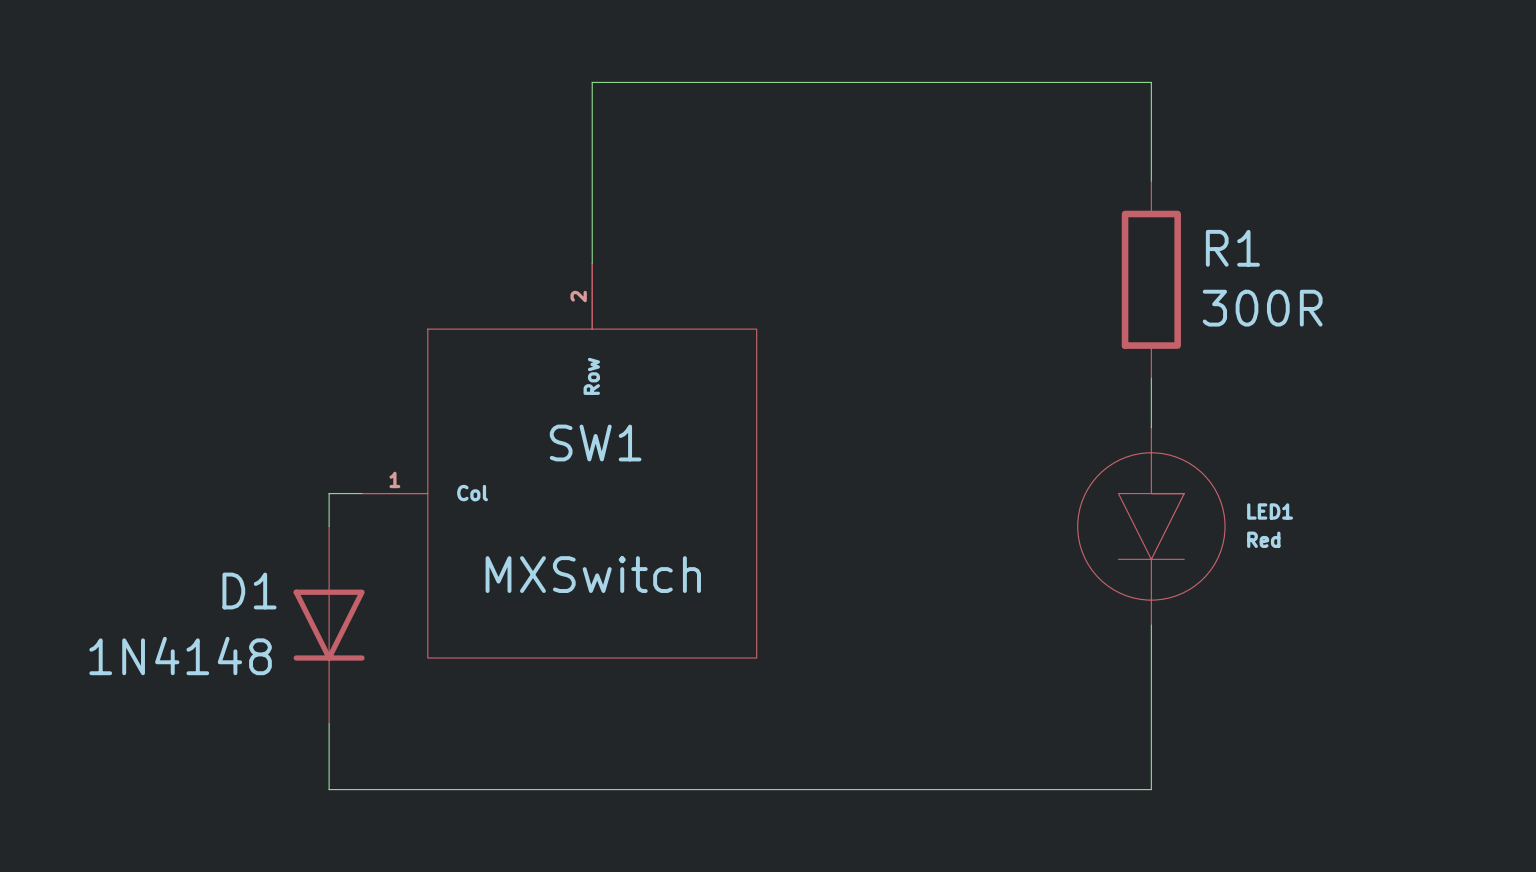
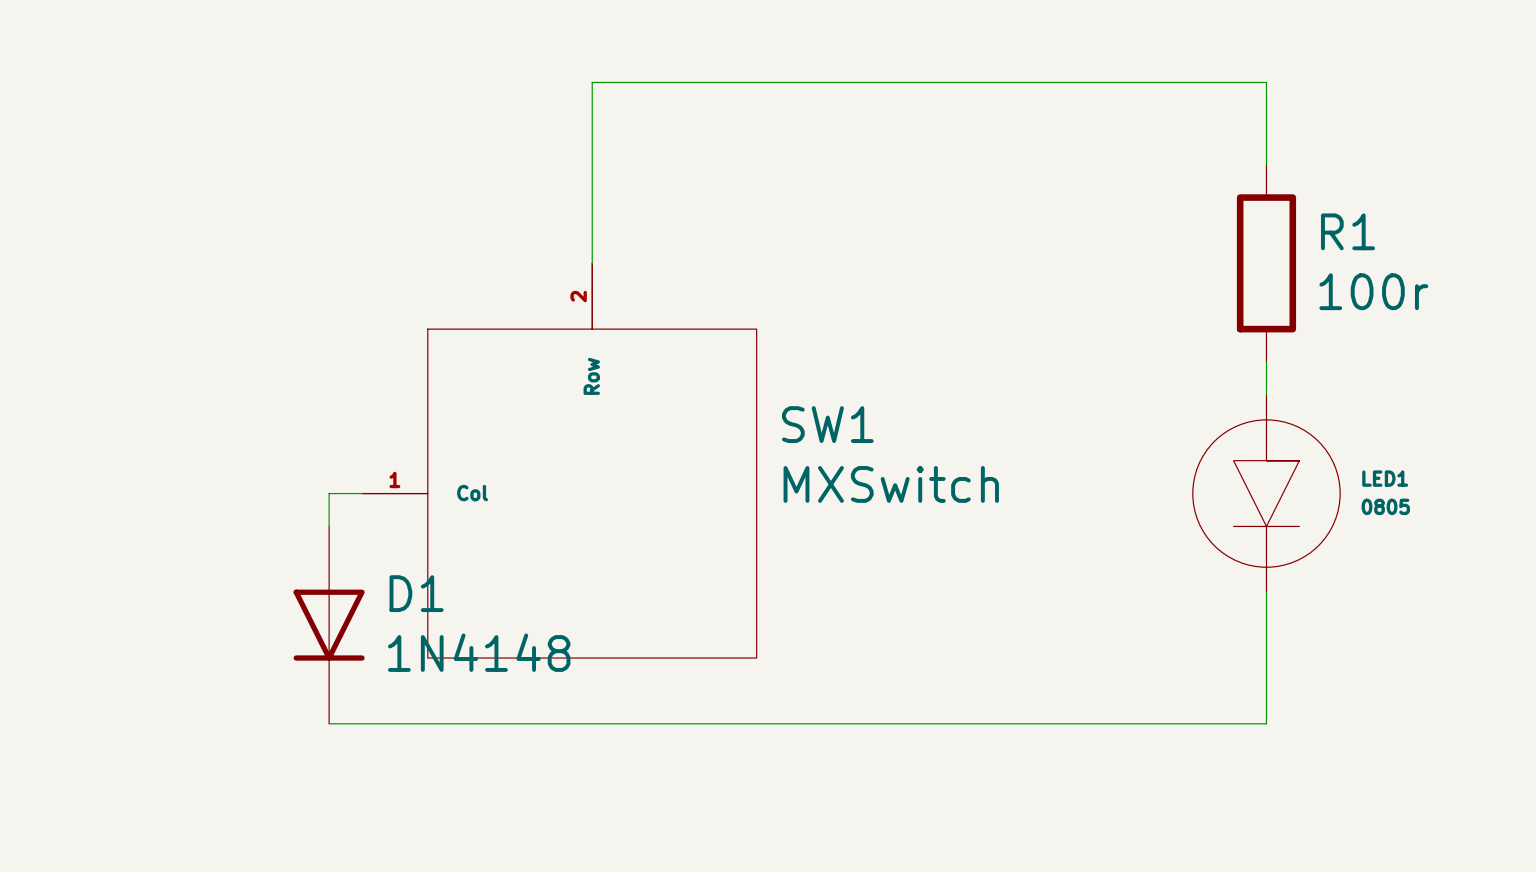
wire: (1151, 82) (1151, 181) -> (1151, 82) (1266, 82) (1266, 164)
R1 position: (1151, 279) -> (1266, 263)
R1 value: 300R (1262, 308) -> 100r (1373, 291)
wire: none -> (1266, 362) (1266, 394)
wire: (1151, 378) (1151, 427) -> none
SW1 name position: SW1 (595, 443) -> SW1 (827, 424)
LED1 position: (1151, 526) -> (1266, 493)
LED1 value: Red (1263, 539) -> 0805 (1385, 506)
SW1 value position: MXSwitch (593, 574) -> MXSwitch (891, 484)
D1 name position: D1 (249, 591) -> D1 (416, 593)
wire: (1151, 625) (1151, 789) (329, 789) (329, 723) -> (1266, 592) (1266, 723) (329, 723)
D1 value position: 1N4148 (180, 656) -> 1N4148 (479, 652)

